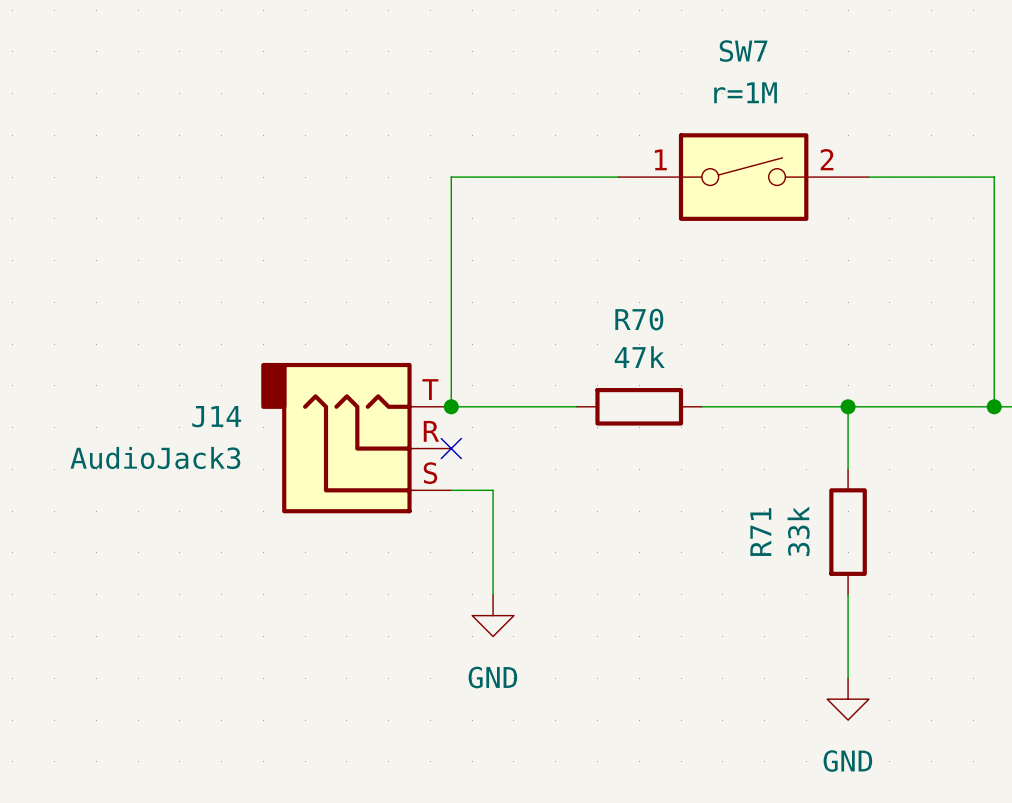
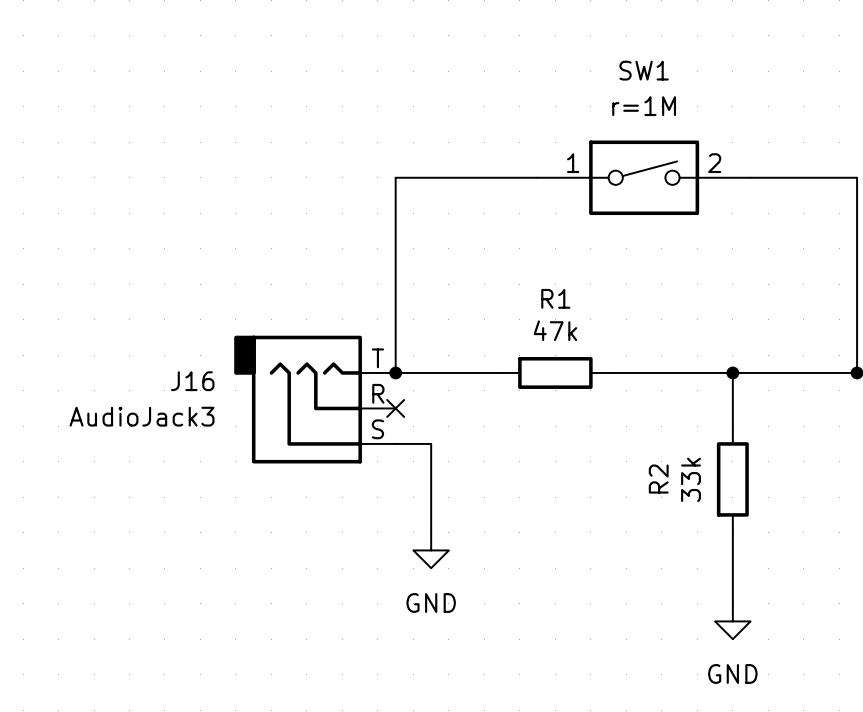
SW7 name: SW7 (743, 51) -> SW1 (644, 70)
R70 name: R70 (639, 319) -> R1 (555, 298)
J14 name: J14 (216, 416) -> J16 (192, 381)
R71 name: R71 (760, 532) -> R2 (658, 479)

